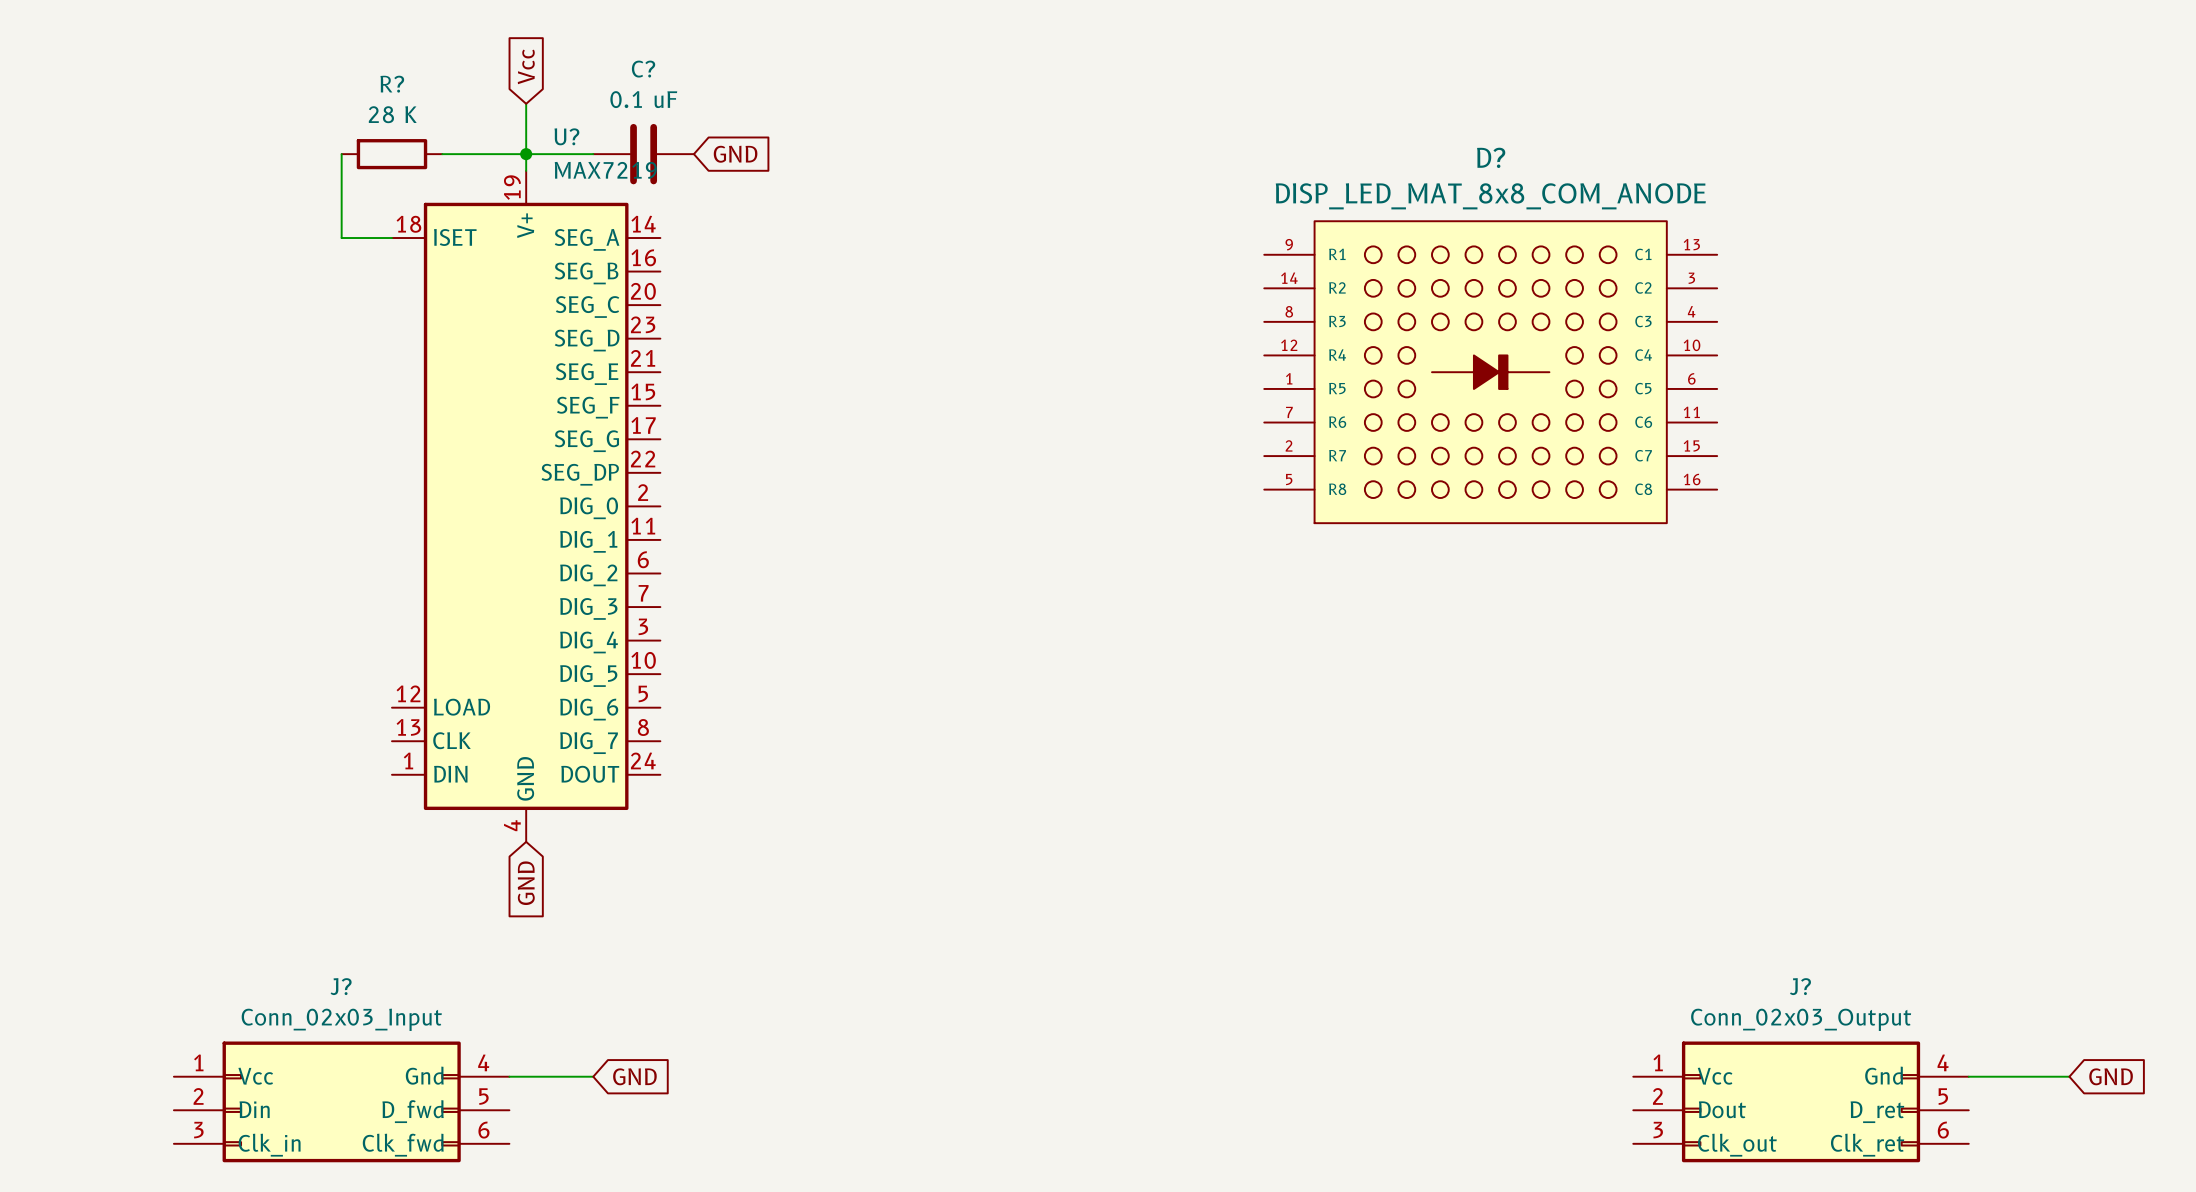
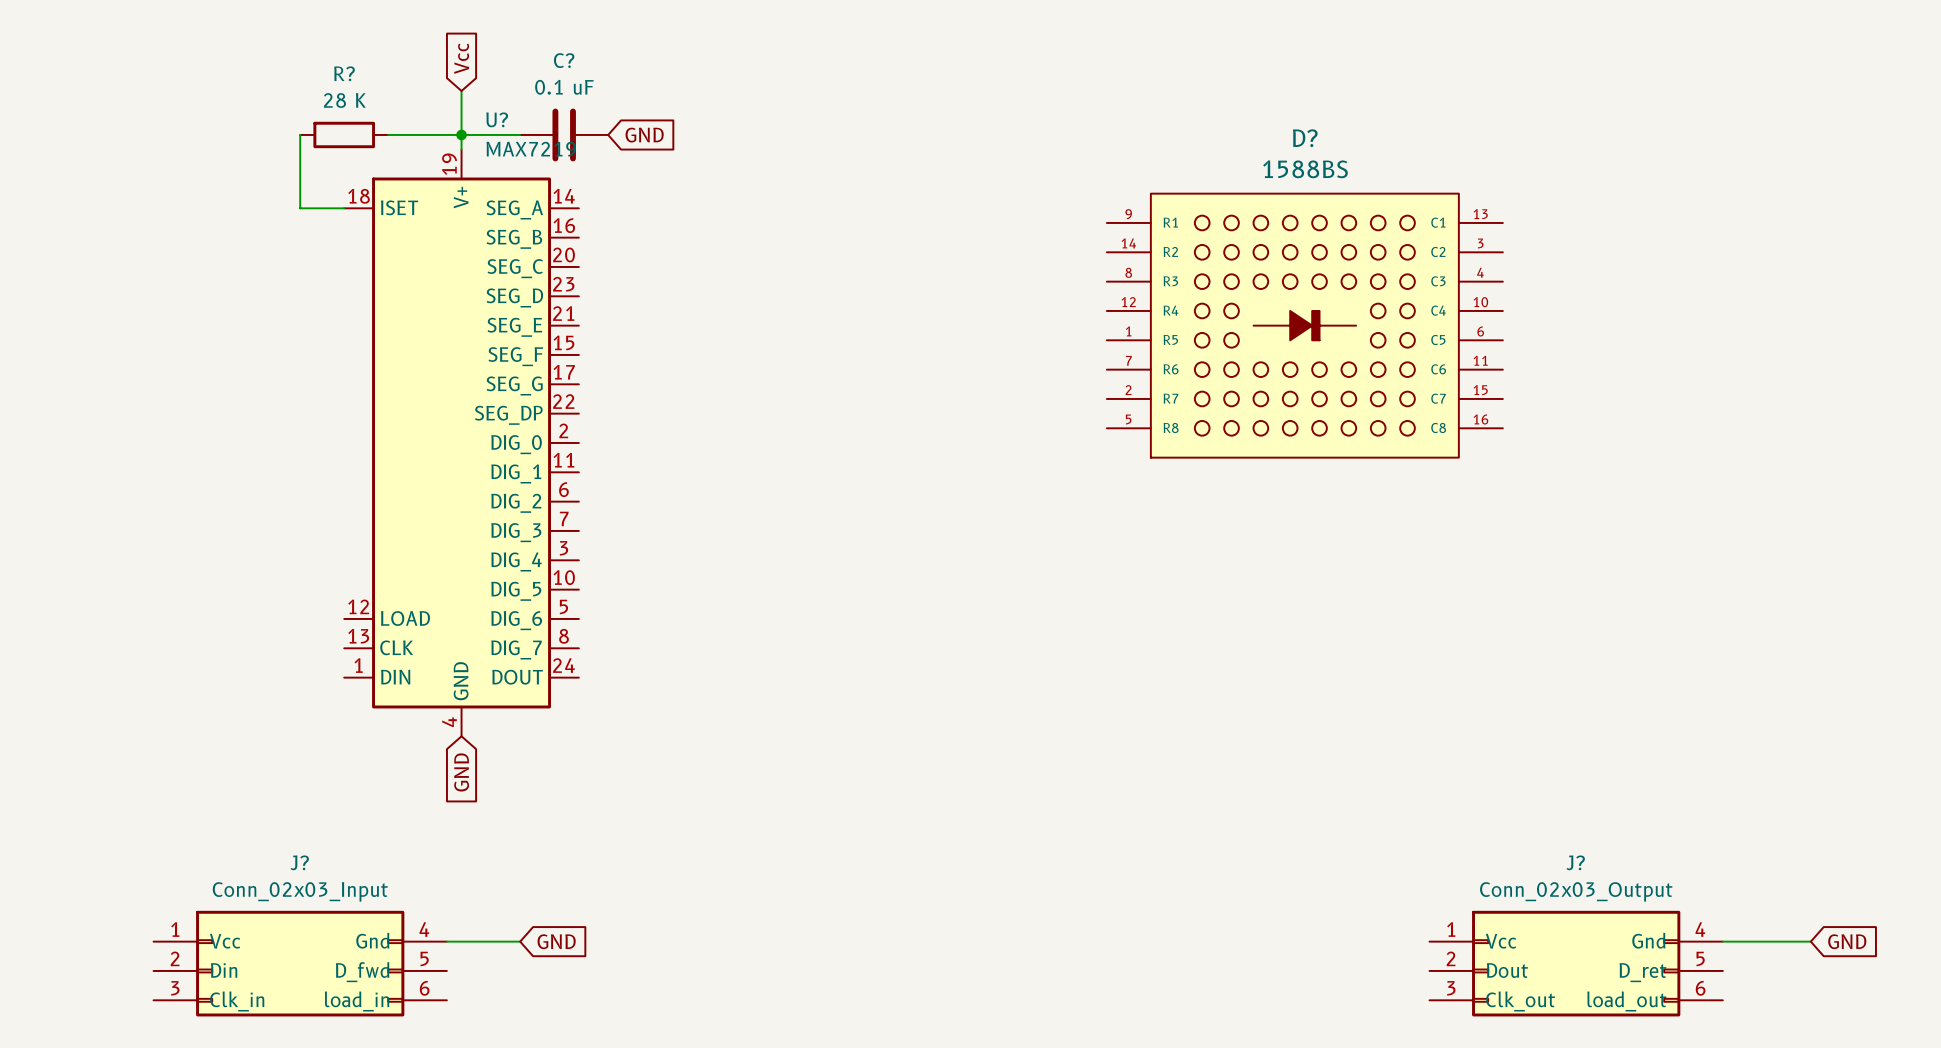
D? value: DISP_LED_MAT_8x8_COM_ANODE (1490, 196) -> 1588BS (1305, 169)
J? pin name: Clk_fwd (403, 1145) -> load_in (357, 1001)
J? pin name: Clk_ret (1867, 1145) -> load_out (1626, 1001)

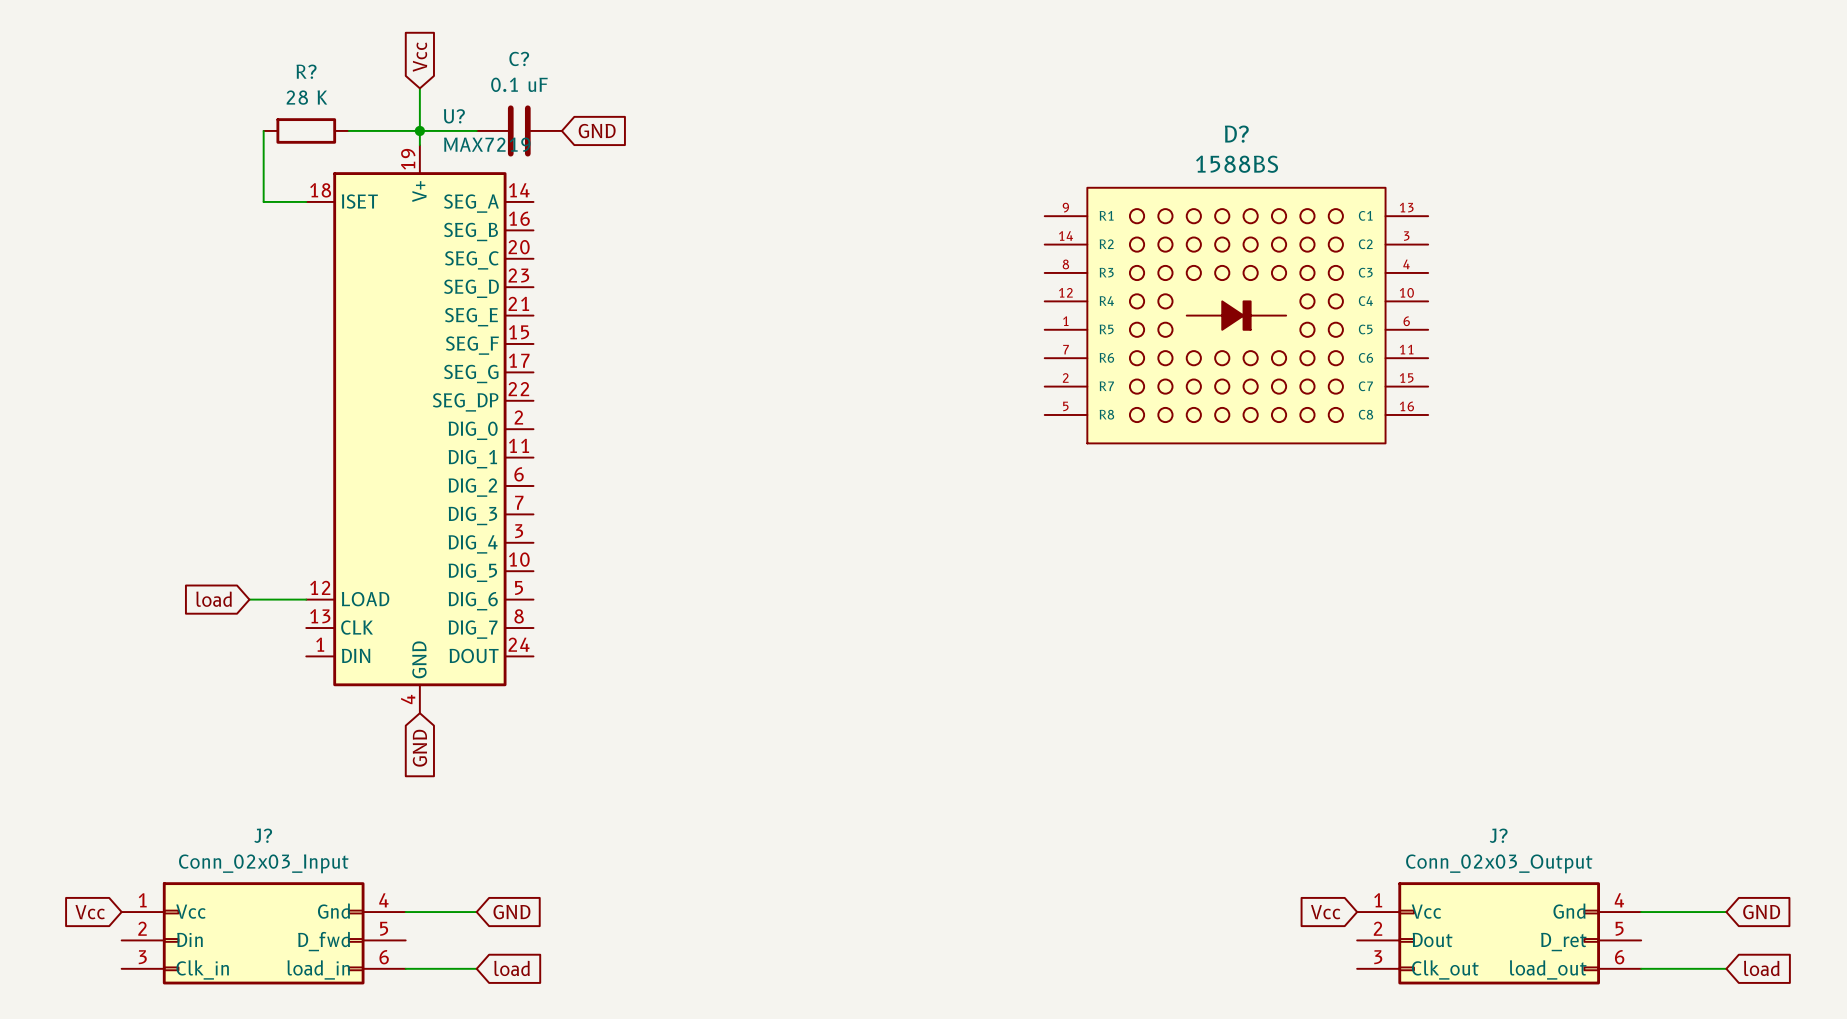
global label: none -> load (214, 599)
wire: none -> (249, 599) (306, 599)
global label: none -> Vcc (90, 912)
global label: none -> Vcc (1325, 912)
global label: none -> load (512, 968)
global label: none -> load (1761, 968)
wire: none -> (405, 968) (476, 968)
wire: none -> (1641, 968) (1726, 968)

